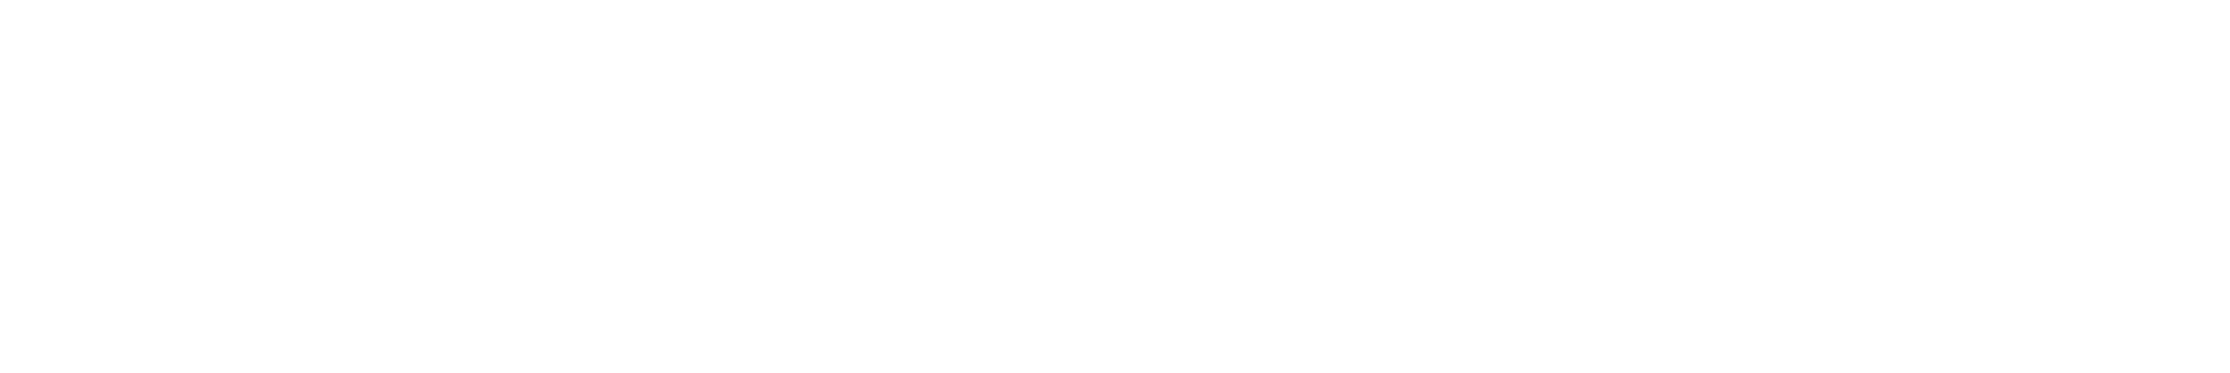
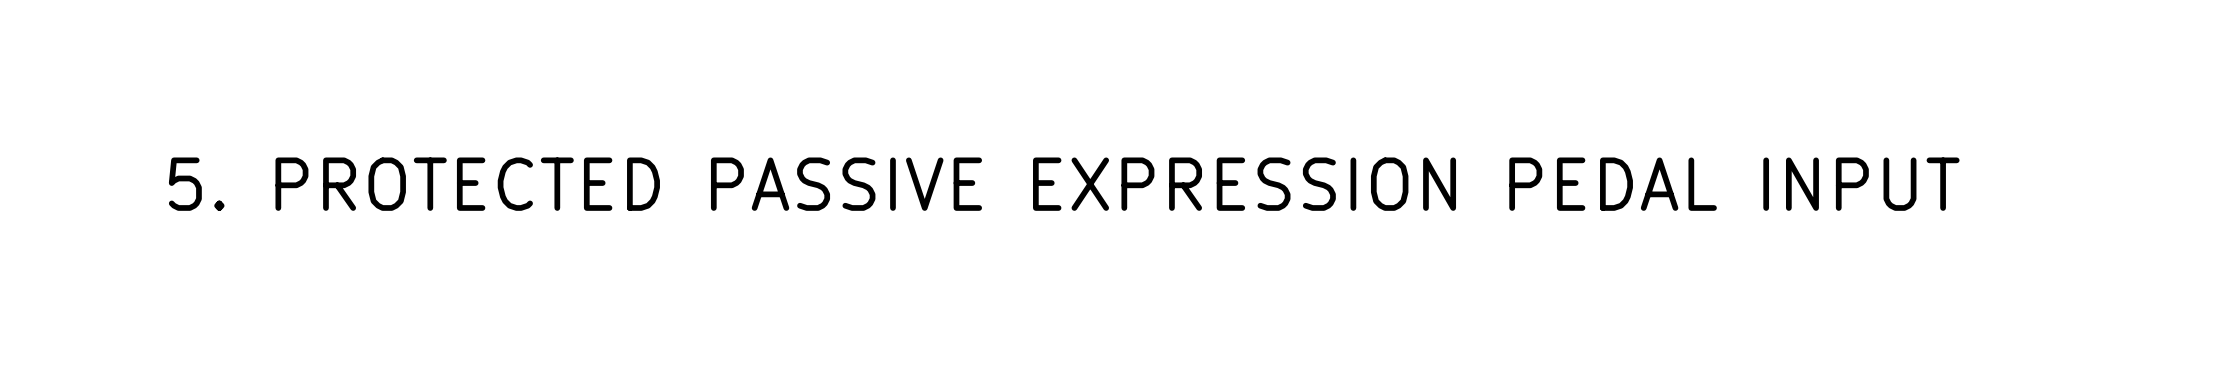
text: none -> 5. PROTECTED PASSIVE EXPRESSION PEDAL INPUT (1064, 184)

